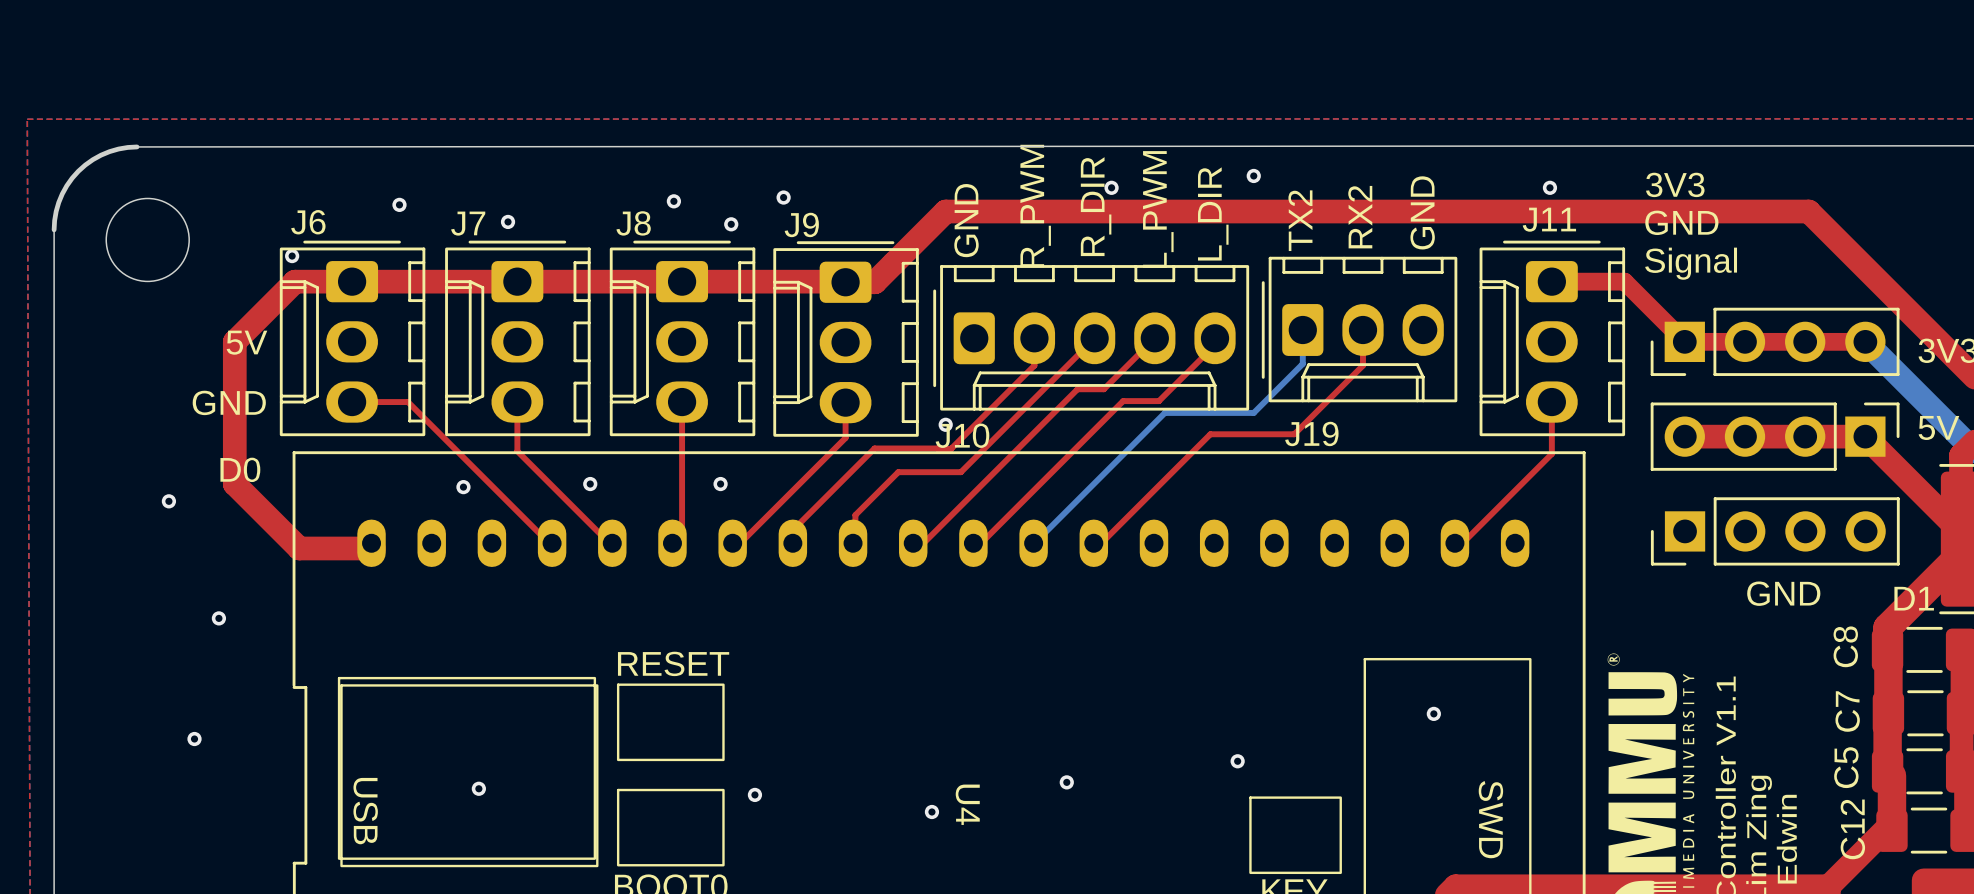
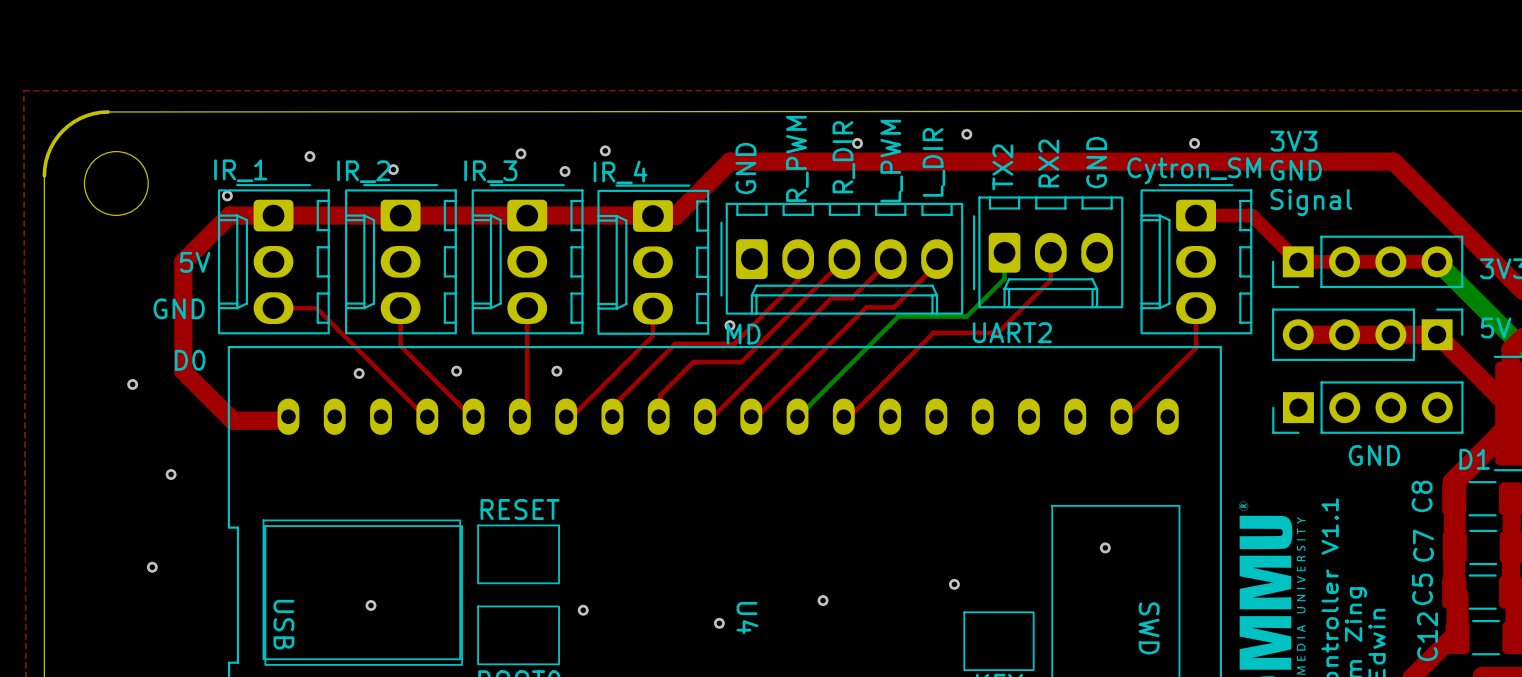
J11 name: J11 (1549, 219) -> Cytron_SM (1194, 170)
J6 name: J6 (308, 222) -> IR_1 (240, 170)
J7 name: J7 (468, 223) -> IR_2 (363, 171)
J8 name: J8 (633, 223) -> IR_3 (490, 171)
J9 name: J9 (801, 224) -> IR_4 (620, 172)
J19 name: J19 (1311, 433) -> UART2 (1012, 332)
J10 name: J10 (962, 435) -> MD (743, 334)

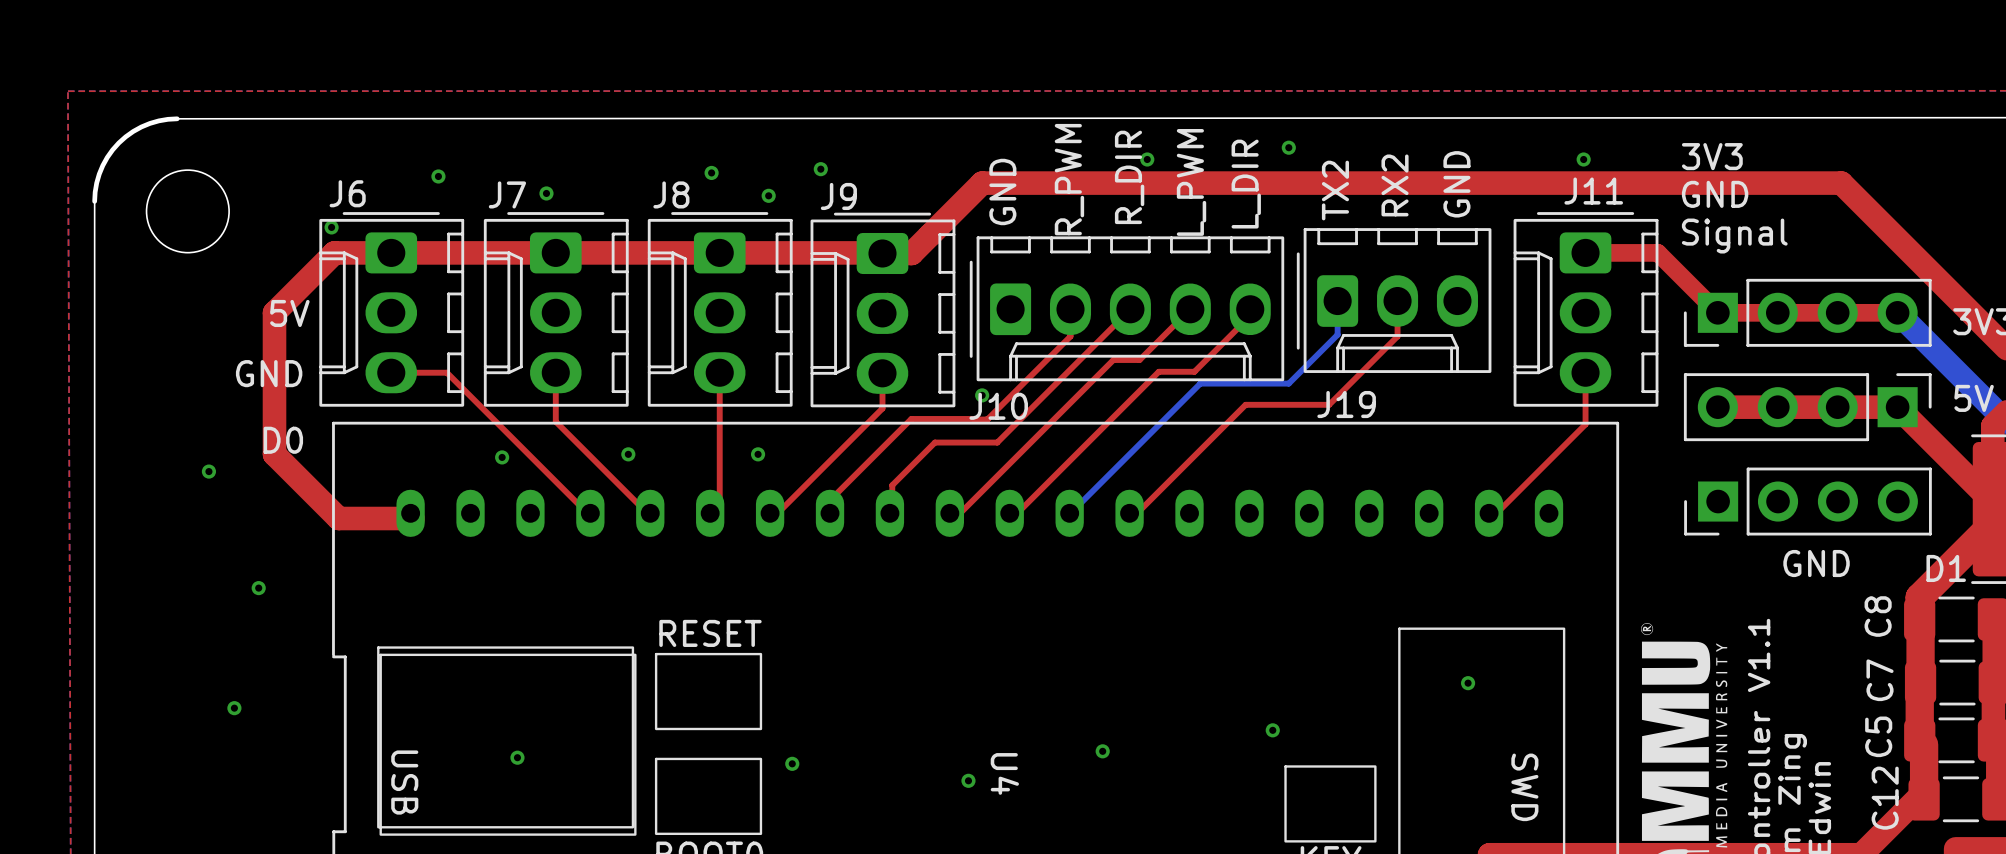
IR_1 name: IR_1 (240, 170) -> J6 (347, 193)
Cytron_SM name: Cytron_SM (1194, 170) -> J11 (1593, 191)
IR_2 name: IR_2 (363, 171) -> J7 (507, 194)
IR_3 name: IR_3 (490, 171) -> J8 (671, 194)
IR_4 name: IR_4 (620, 172) -> J9 (838, 196)
UART2 name: UART2 (1012, 332) -> J19 (1346, 404)
MD name: MD (743, 334) -> J10 (998, 406)

